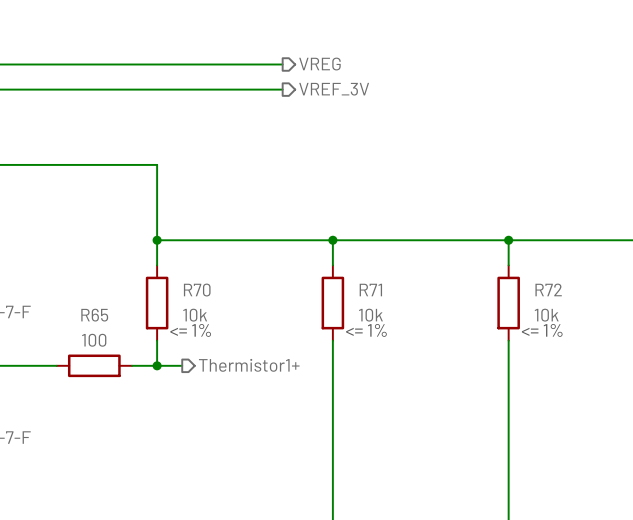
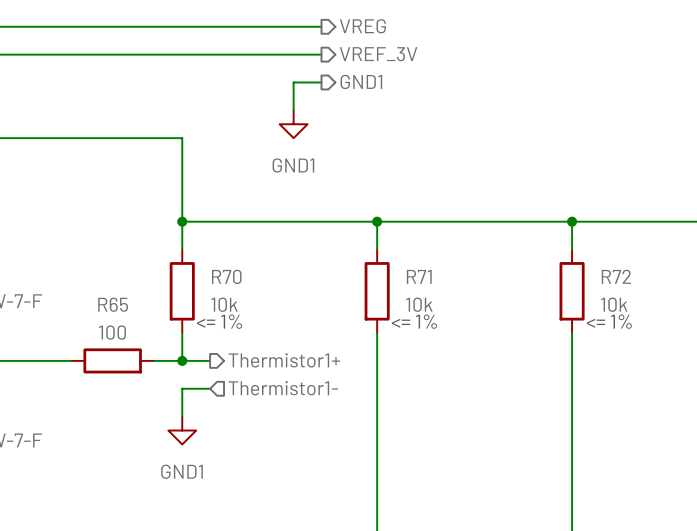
wire: none -> (321, 82) (293, 82) (293, 110)
hierarchical label: none -> GND1 (361, 81)
power symbol: none -> GND1 (293, 124)
wire: none -> (210, 388) (182, 388) (182, 416)
hierarchical label: none -> Thermistor1- (283, 388)
power symbol: none -> GND1 (182, 430)

